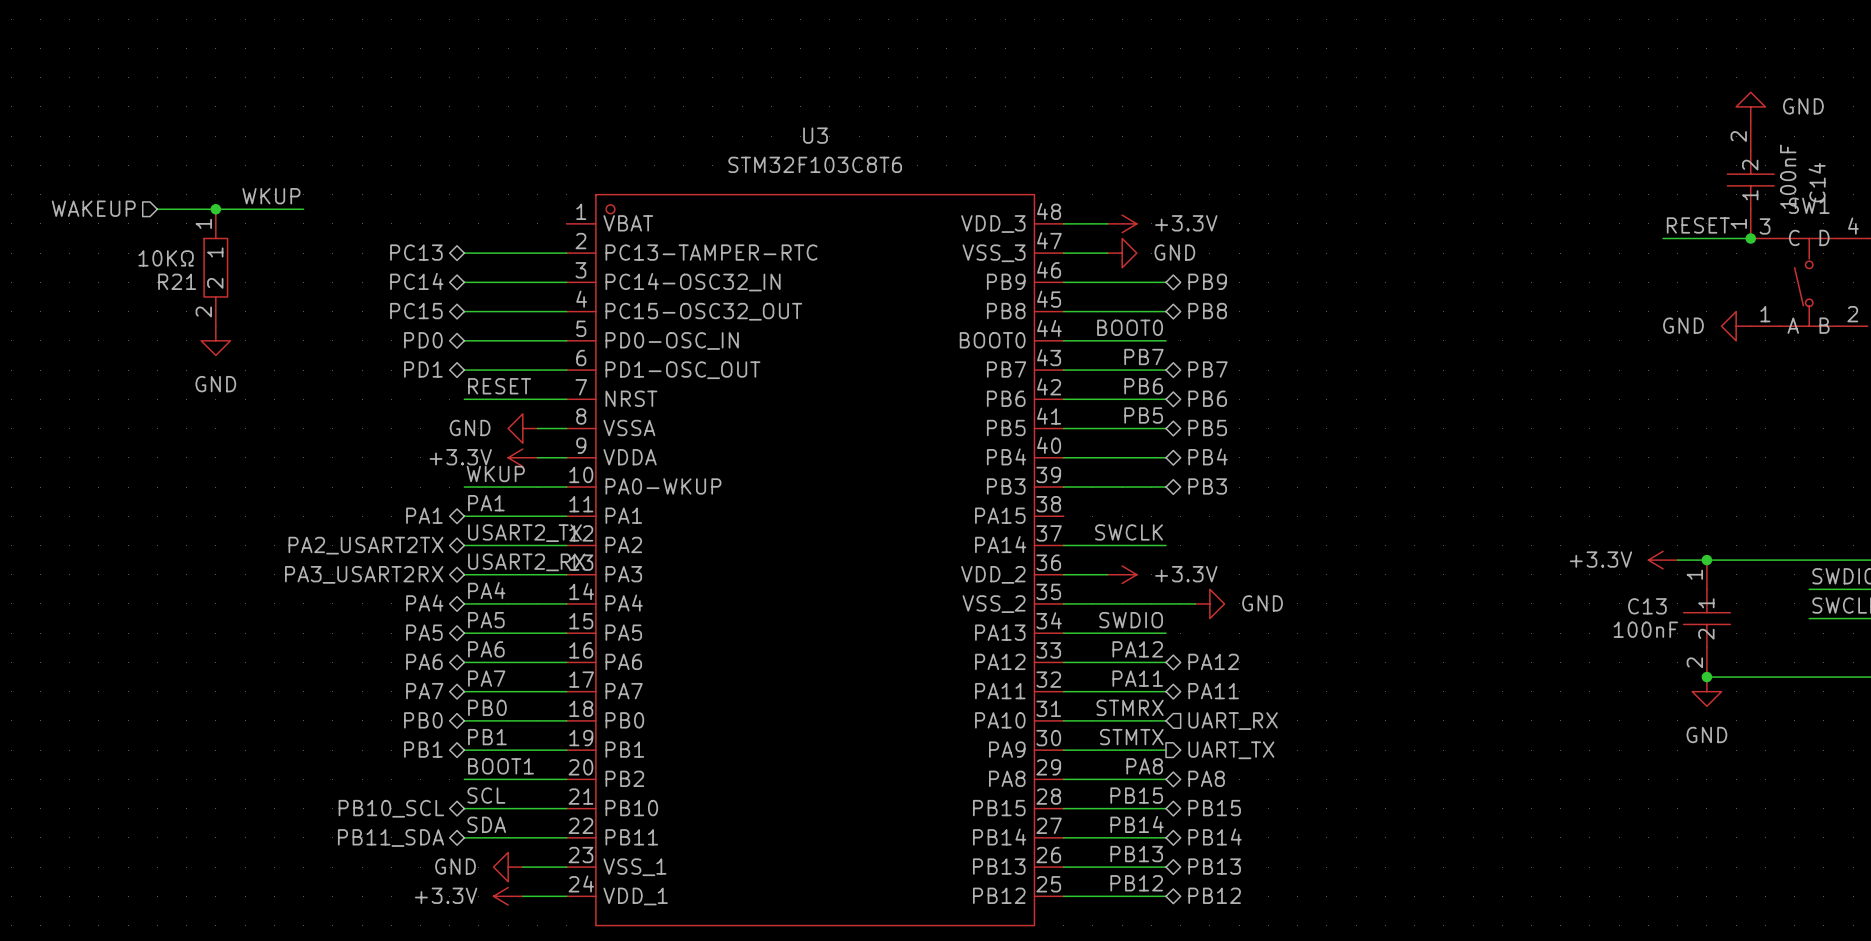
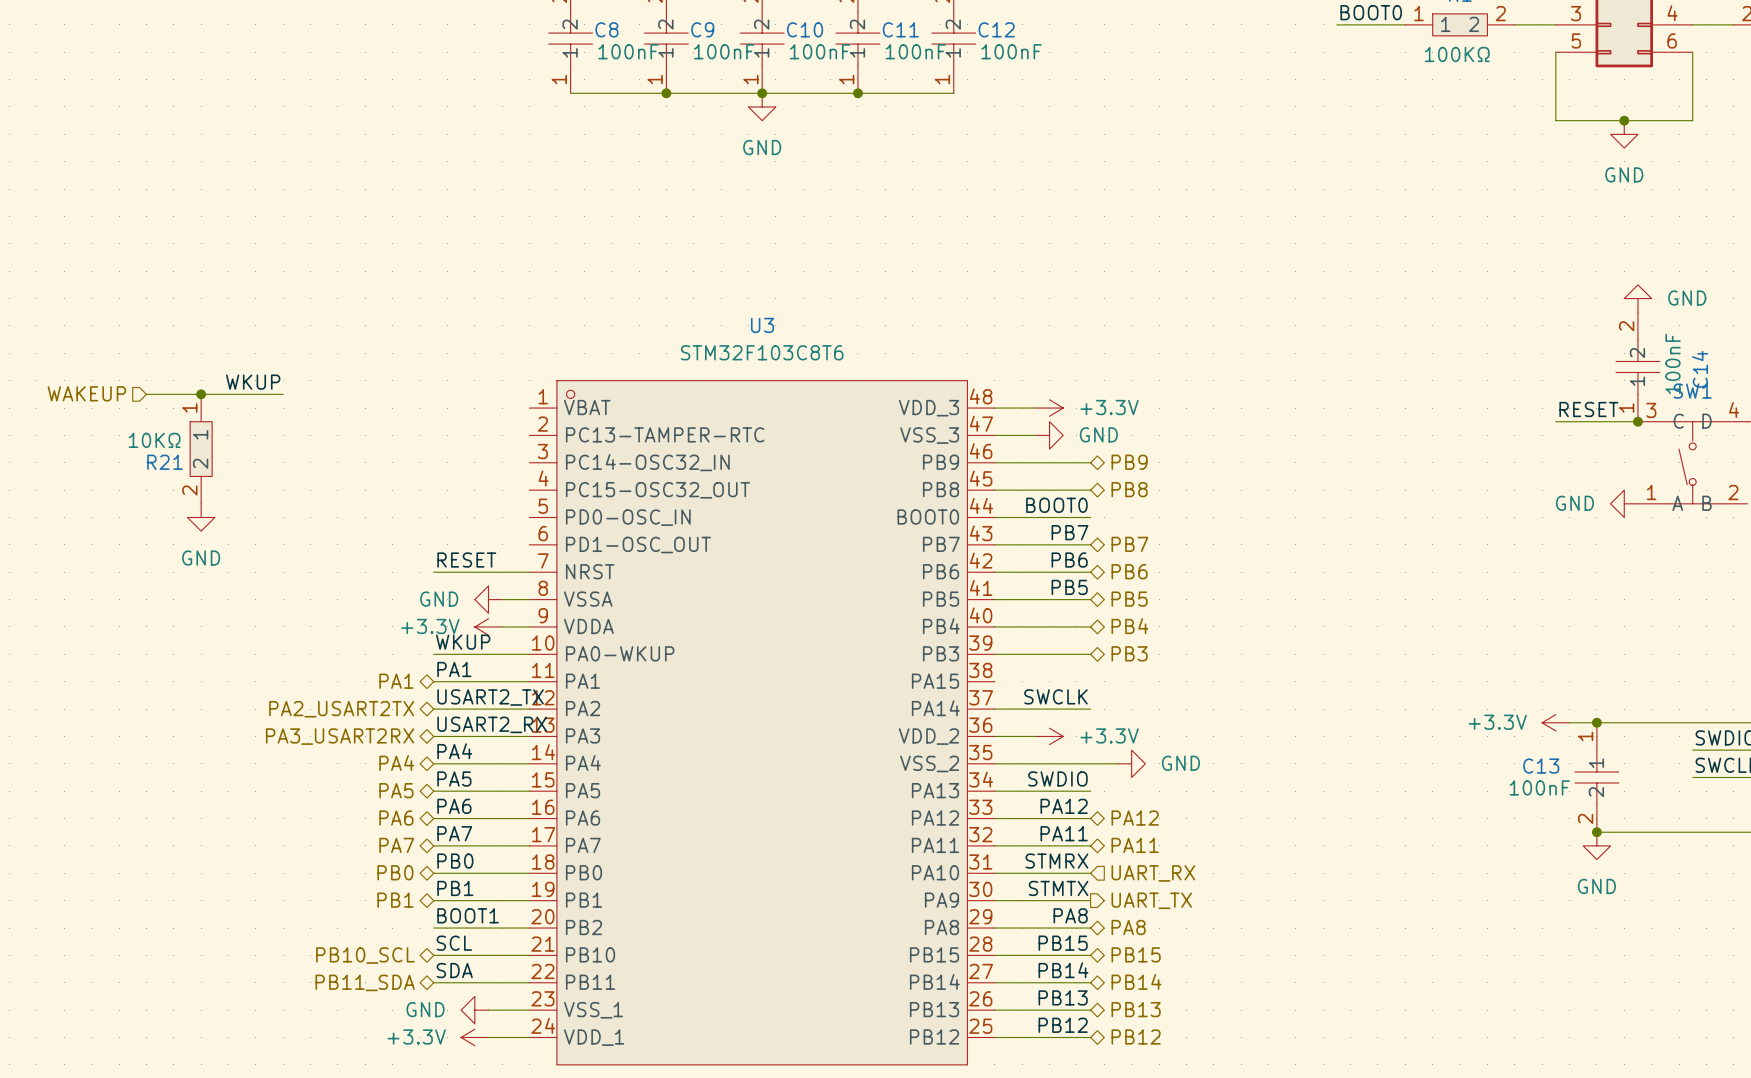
hierarchical label: PC13 (416, 252) -> none
wire: (464, 253) (566, 253) -> none
hierarchical label: PC14 (416, 281) -> none
wire: (464, 282) (566, 282) -> none
hierarchical label: PC15 (416, 311) -> none
wire: (464, 311) (566, 311) -> none
hierarchical label: PD0 (423, 340) -> none
wire: (464, 340) (566, 340) -> none
hierarchical label: PD1 (423, 369) -> none
wire: (464, 370) (566, 370) -> none

